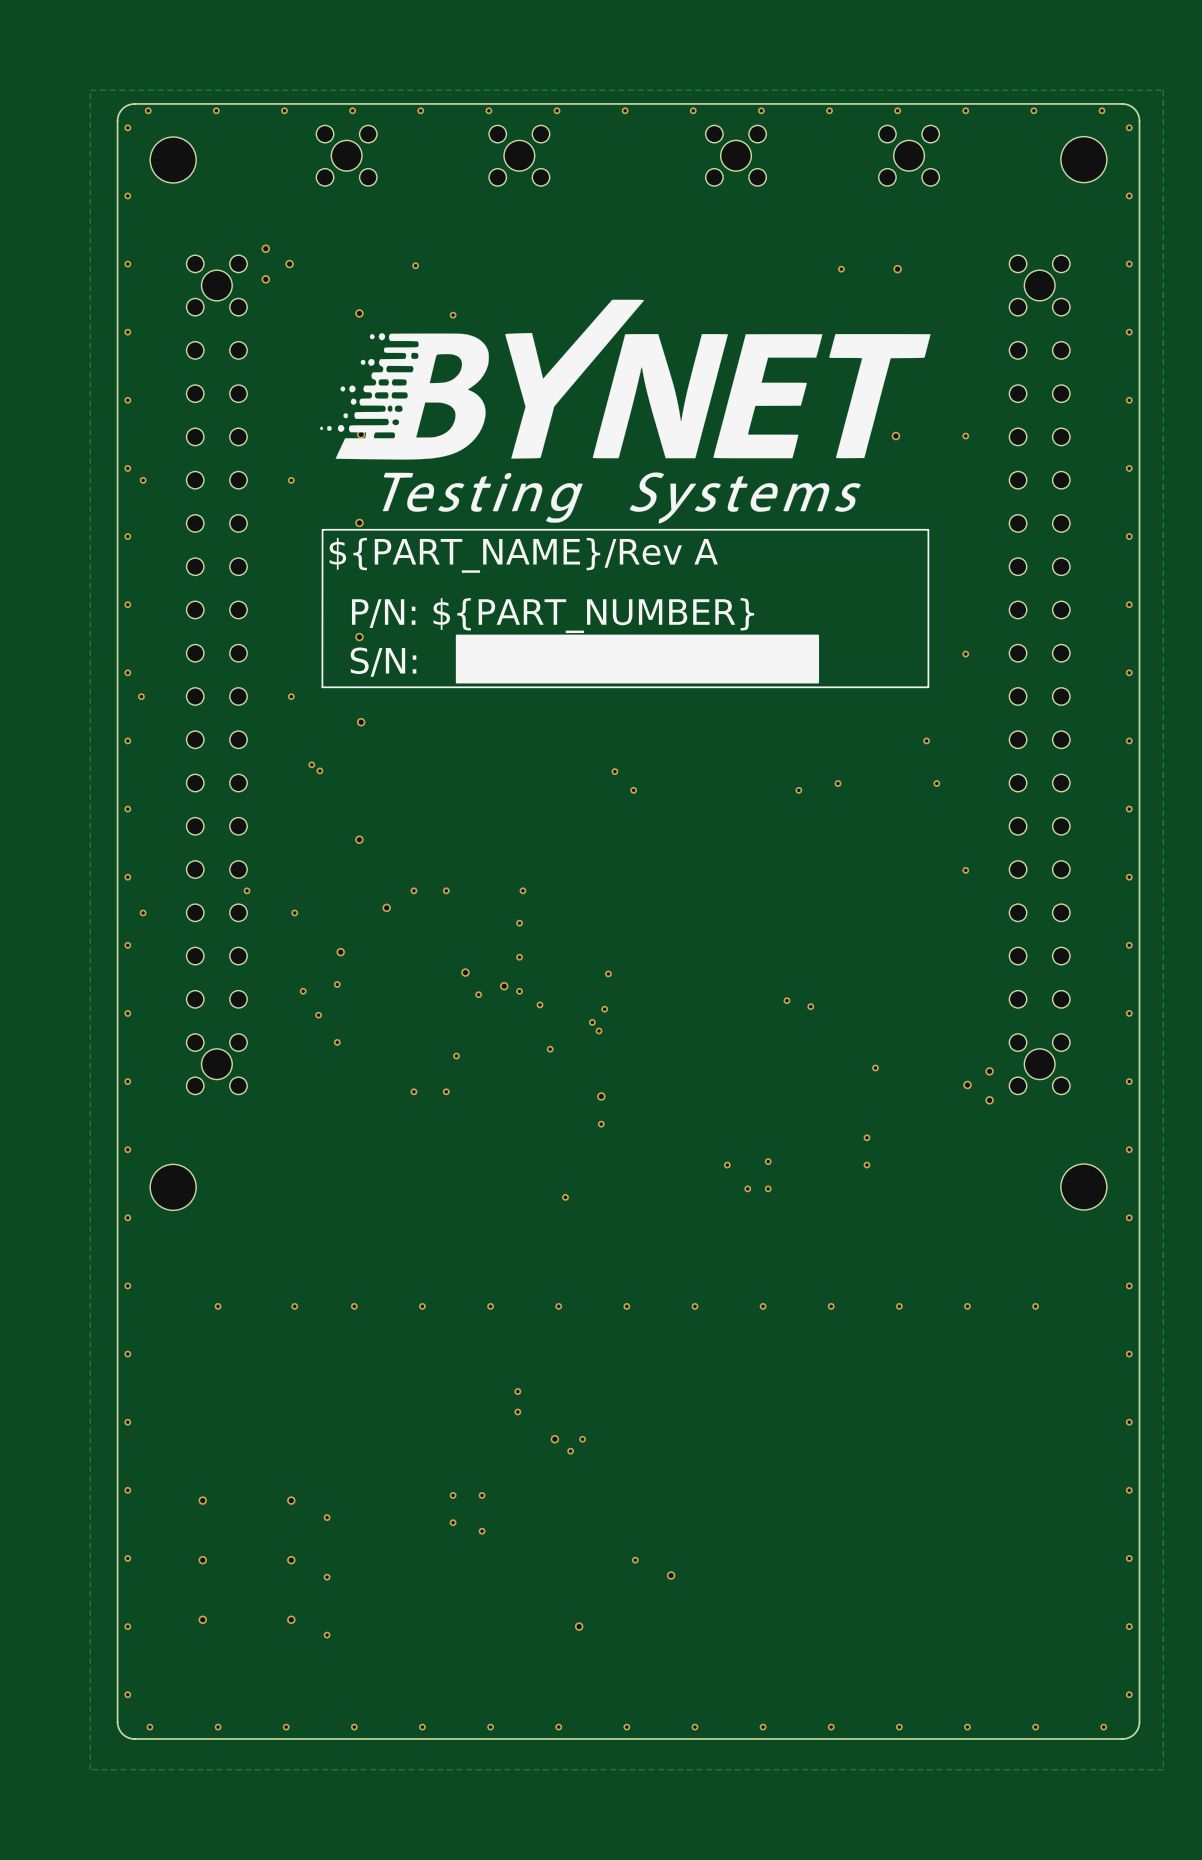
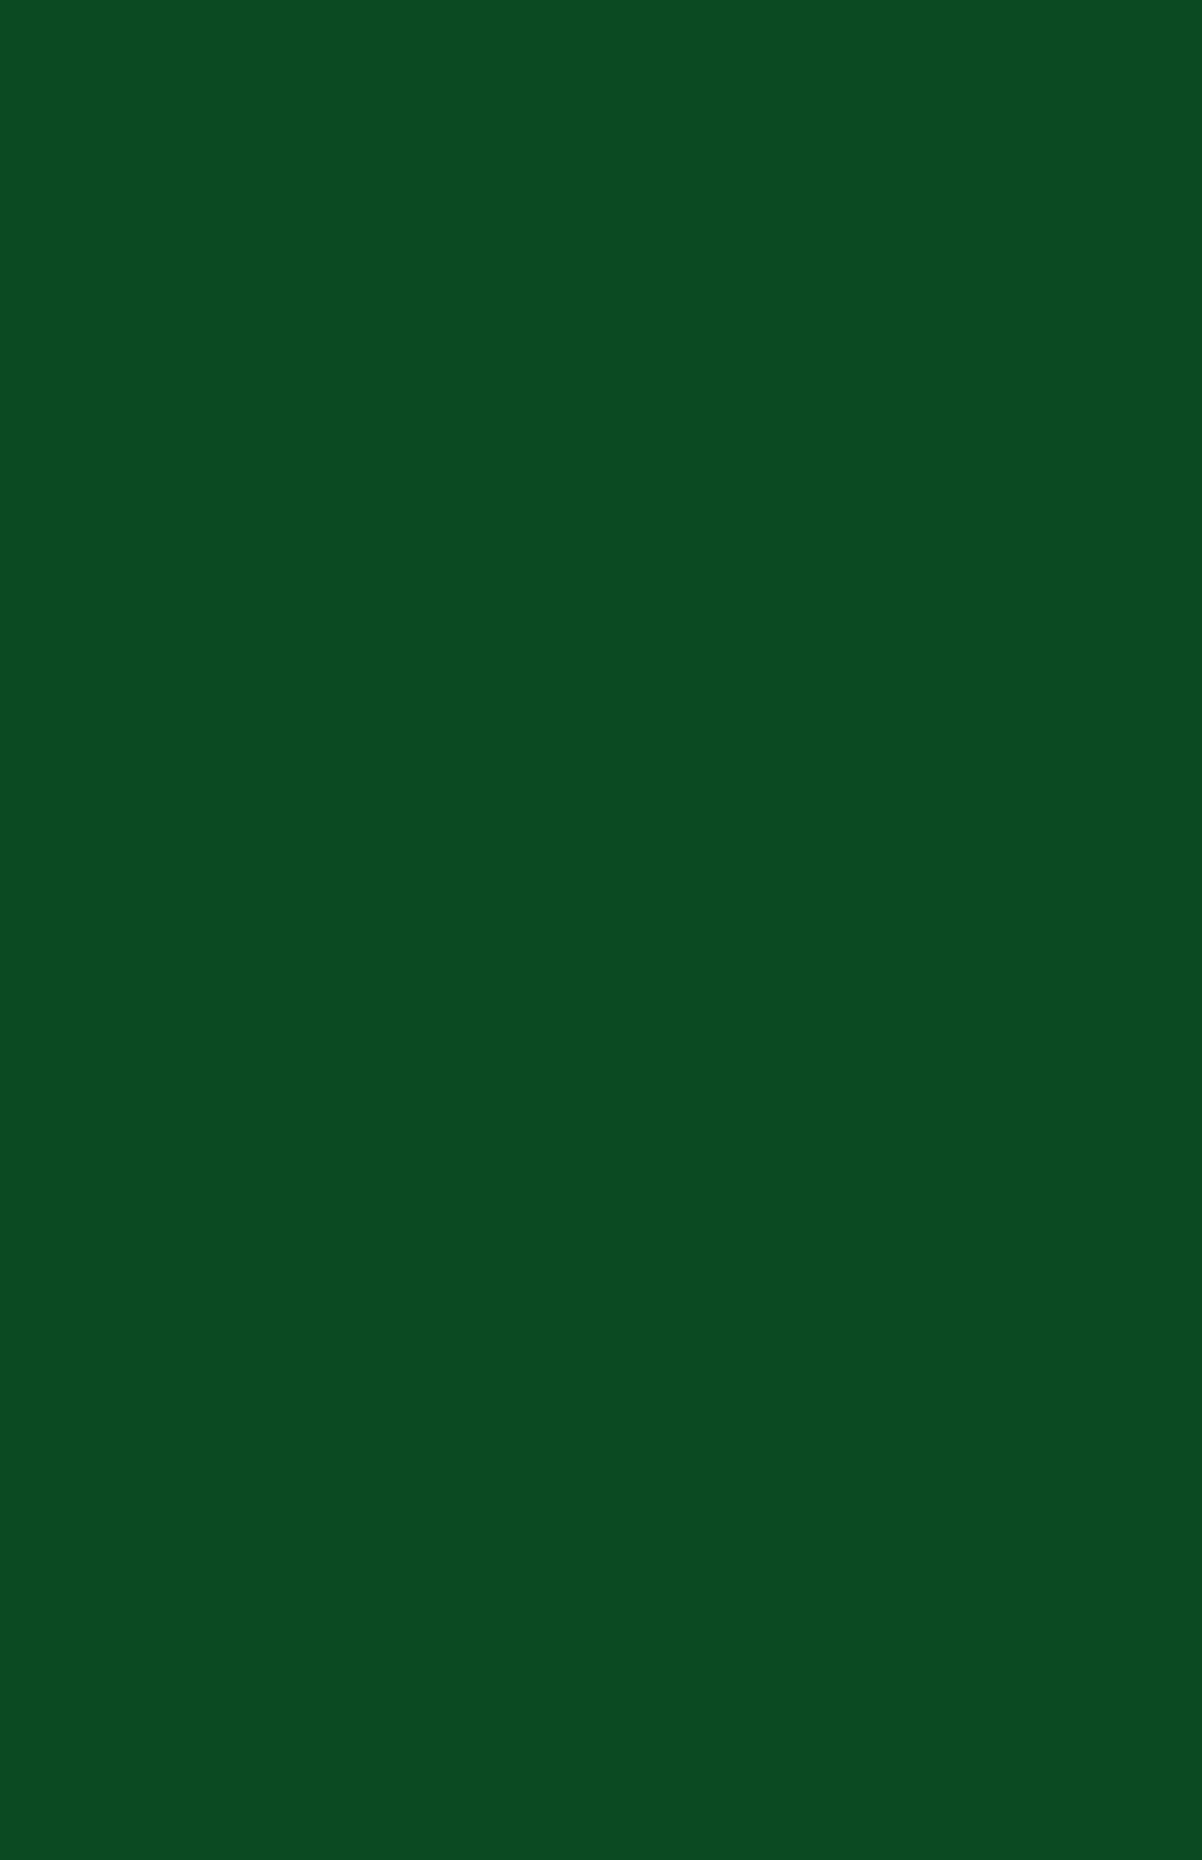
zone outline: (1163, 90) (1163, 1769) (90, 1769) (90, 90) (1163, 90) -> none
board edge: (1122, 103) (134, 103) (125, 106) (120, 111) (117, 120) (117, 1721) (119, 1729) (125, 1736) (134, 1739) (1122, 1739) (1129, 1737) (1136, 1731) (1139, 1721) (1139, 120) (1134, 108) (1122, 103) -> none
via: (148, 110) -> none
via: (216, 110) -> none
via: (284, 110) -> none
via: (352, 110) -> none
via: (420, 110) -> none
via: (488, 110) -> none
via: (557, 110) -> none
via: (625, 110) -> none
via: (693, 110) -> none
via: (761, 110) -> none
via: (829, 110) -> none
via: (897, 110) -> none
via: (965, 110) -> none
via: (1033, 110) -> none
via: (1102, 110) -> none
via: (127, 127) -> none
via: (1129, 127) -> none
part: (346, 155) -> none
part: (519, 155) -> none
part: (736, 155) -> none
part: (909, 155) -> none
part: (173, 159) -> none
part: (1083, 159) -> none
via: (127, 195) -> none
via: (1129, 195) -> none
via: (265, 248) -> none
via: (127, 264) -> none
via: (289, 264) -> none
via: (1129, 264) -> none
via: (415, 265) -> none
via: (841, 269) -> none
via: (897, 269) -> none
via: (265, 279) -> none
drawing: [320, 299, 931, 524] -> none
via: (359, 313) -> none
via: (453, 315) -> none
via: (127, 332) -> none
via: (1129, 332) -> none
via: (127, 400) -> none
via: (1129, 400) -> none
via: (361, 434) -> none
via: (895, 436) -> none
via: (965, 436) -> none
via: (127, 468) -> none
via: (1129, 468) -> none
via: (143, 480) -> none
via: (291, 480) -> none
via: (359, 522) -> none
line: (928, 529) (322, 529) (322, 687) (928, 687) (928, 529) -> none
via: (127, 536) -> none
via: (1129, 536) -> none
text: ${PART_NAME}/Rev A (523, 555) -> none
via: (127, 604) -> none
via: (1129, 604) -> none
text: P/N: ${PART_NUMBER} (553, 615) -> none
drawing: [455, 634, 820, 684] -> none
via: (359, 637) -> none
via: (965, 654) -> none
text: S/N: (383, 662) -> none
via: (127, 672) -> none
via: (1129, 672) -> none
part: (216, 674) -> none
part: (1039, 674) -> none
via: (141, 696) -> none
via: (291, 696) -> none
via: (361, 722) -> none
via: (127, 740) -> none
via: (926, 740) -> none
via: (1129, 740) -> none
via: (311, 764) -> none
via: (319, 770) -> none
via: (614, 771) -> none
via: (838, 783) -> none
via: (936, 783) -> none
via: (633, 790) -> none
via: (798, 790) -> none
via: (127, 809) -> none
via: (1129, 809) -> none
via: (359, 839) -> none
via: (965, 870) -> none
via: (127, 877) -> none
via: (1129, 877) -> none
via: (247, 890) -> none
via: (413, 890) -> none
via: (446, 890) -> none
via: (522, 890) -> none
via: (386, 907) -> none
via: (143, 912) -> none
via: (294, 912) -> none
via: (519, 923) -> none
via: (127, 945) -> none
via: (1129, 945) -> none
via: (340, 952) -> none
via: (519, 957) -> none
via: (465, 972) -> none
via: (608, 973) -> none
via: (337, 984) -> none
via: (504, 986) -> none
via: (303, 991) -> none
via: (519, 991) -> none
via: (478, 994) -> none
via: (786, 1000) -> none
via: (539, 1004) -> none
via: (810, 1006) -> none
via: (604, 1009) -> none
via: (127, 1013) -> none
via: (1129, 1013) -> none
via: (318, 1015) -> none
via: (592, 1022) -> none
via: (598, 1030) -> none
via: (337, 1042) -> none
via: (550, 1049) -> none
via: (456, 1056) -> none
via: (875, 1067) -> none
via: (989, 1071) -> none
via: (127, 1081) -> none
via: (1129, 1081) -> none
via: (967, 1084) -> none
via: (413, 1091) -> none
via: (446, 1091) -> none
via: (601, 1096) -> none
via: (989, 1100) -> none
via: (601, 1124) -> none
via: (866, 1137) -> none
via: (127, 1149) -> none
via: (1129, 1149) -> none
via: (768, 1161) -> none
via: (727, 1165) -> none
via: (866, 1165) -> none
part: (173, 1187) -> none
part: (1083, 1187) -> none
via: (747, 1188) -> none
via: (768, 1188) -> none
via: (565, 1197) -> none
via: (127, 1217) -> none
via: (1129, 1217) -> none
via: (127, 1285) -> none
via: (1129, 1285) -> none
via: (218, 1306) -> none
via: (294, 1306) -> none
via: (354, 1306) -> none
via: (422, 1306) -> none
via: (490, 1306) -> none
via: (558, 1306) -> none
via: (626, 1306) -> none
via: (694, 1306) -> none
via: (763, 1306) -> none
via: (831, 1306) -> none
via: (899, 1306) -> none
via: (967, 1306) -> none
via: (1035, 1306) -> none
via: (127, 1354) -> none
via: (1129, 1354) -> none
via: (517, 1391) -> none
via: (517, 1412) -> none
via: (127, 1422) -> none
via: (1129, 1422) -> none
via: (554, 1439) -> none
via: (582, 1439) -> none
via: (570, 1451) -> none
via: (127, 1490) -> none
via: (1129, 1490) -> none
via: (453, 1495) -> none
via: (482, 1495) -> none
via: (202, 1500) -> none
via: (291, 1500) -> none
via: (327, 1517) -> none
via: (453, 1522) -> none
via: (482, 1531) -> none
via: (127, 1558) -> none
via: (1129, 1558) -> none
via: (202, 1560) -> none
via: (291, 1560) -> none
via: (635, 1560) -> none
via: (671, 1575) -> none
via: (327, 1577) -> none
via: (202, 1619) -> none
via: (291, 1619) -> none
via: (127, 1626) -> none
via: (579, 1626) -> none
via: (1129, 1626) -> none
via: (327, 1635) -> none
via: (127, 1694) -> none
via: (1129, 1694) -> none
via: (149, 1727) -> none
via: (218, 1727) -> none
via: (286, 1727) -> none
via: (354, 1727) -> none
via: (422, 1727) -> none
via: (490, 1727) -> none
via: (558, 1727) -> none
via: (626, 1727) -> none
via: (694, 1727) -> none
via: (763, 1727) -> none
via: (831, 1727) -> none
via: (899, 1727) -> none
via: (967, 1727) -> none
via: (1035, 1727) -> none
via: (1103, 1727) -> none

